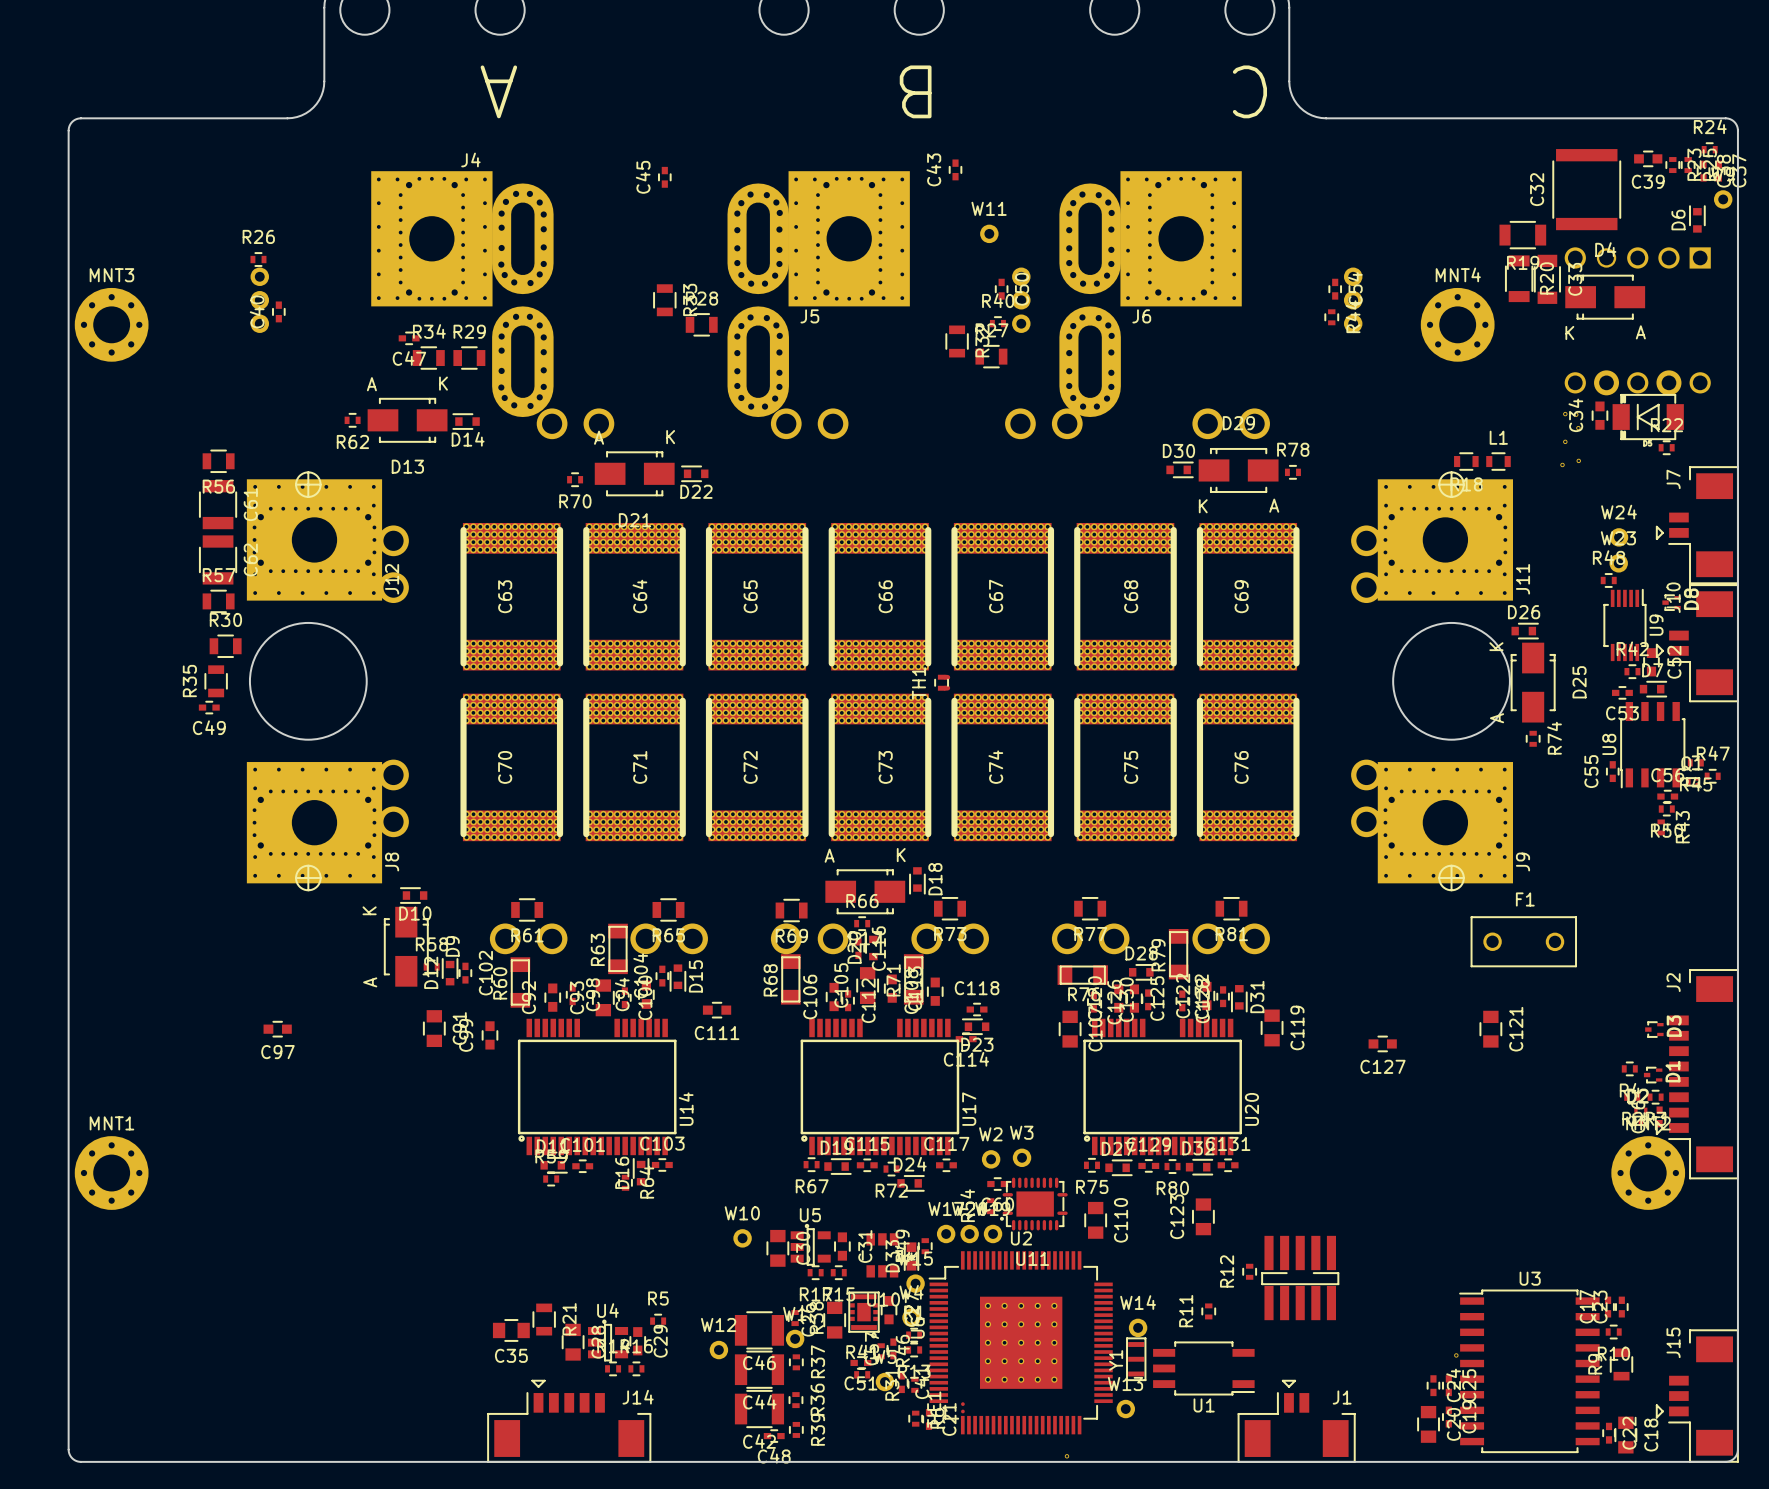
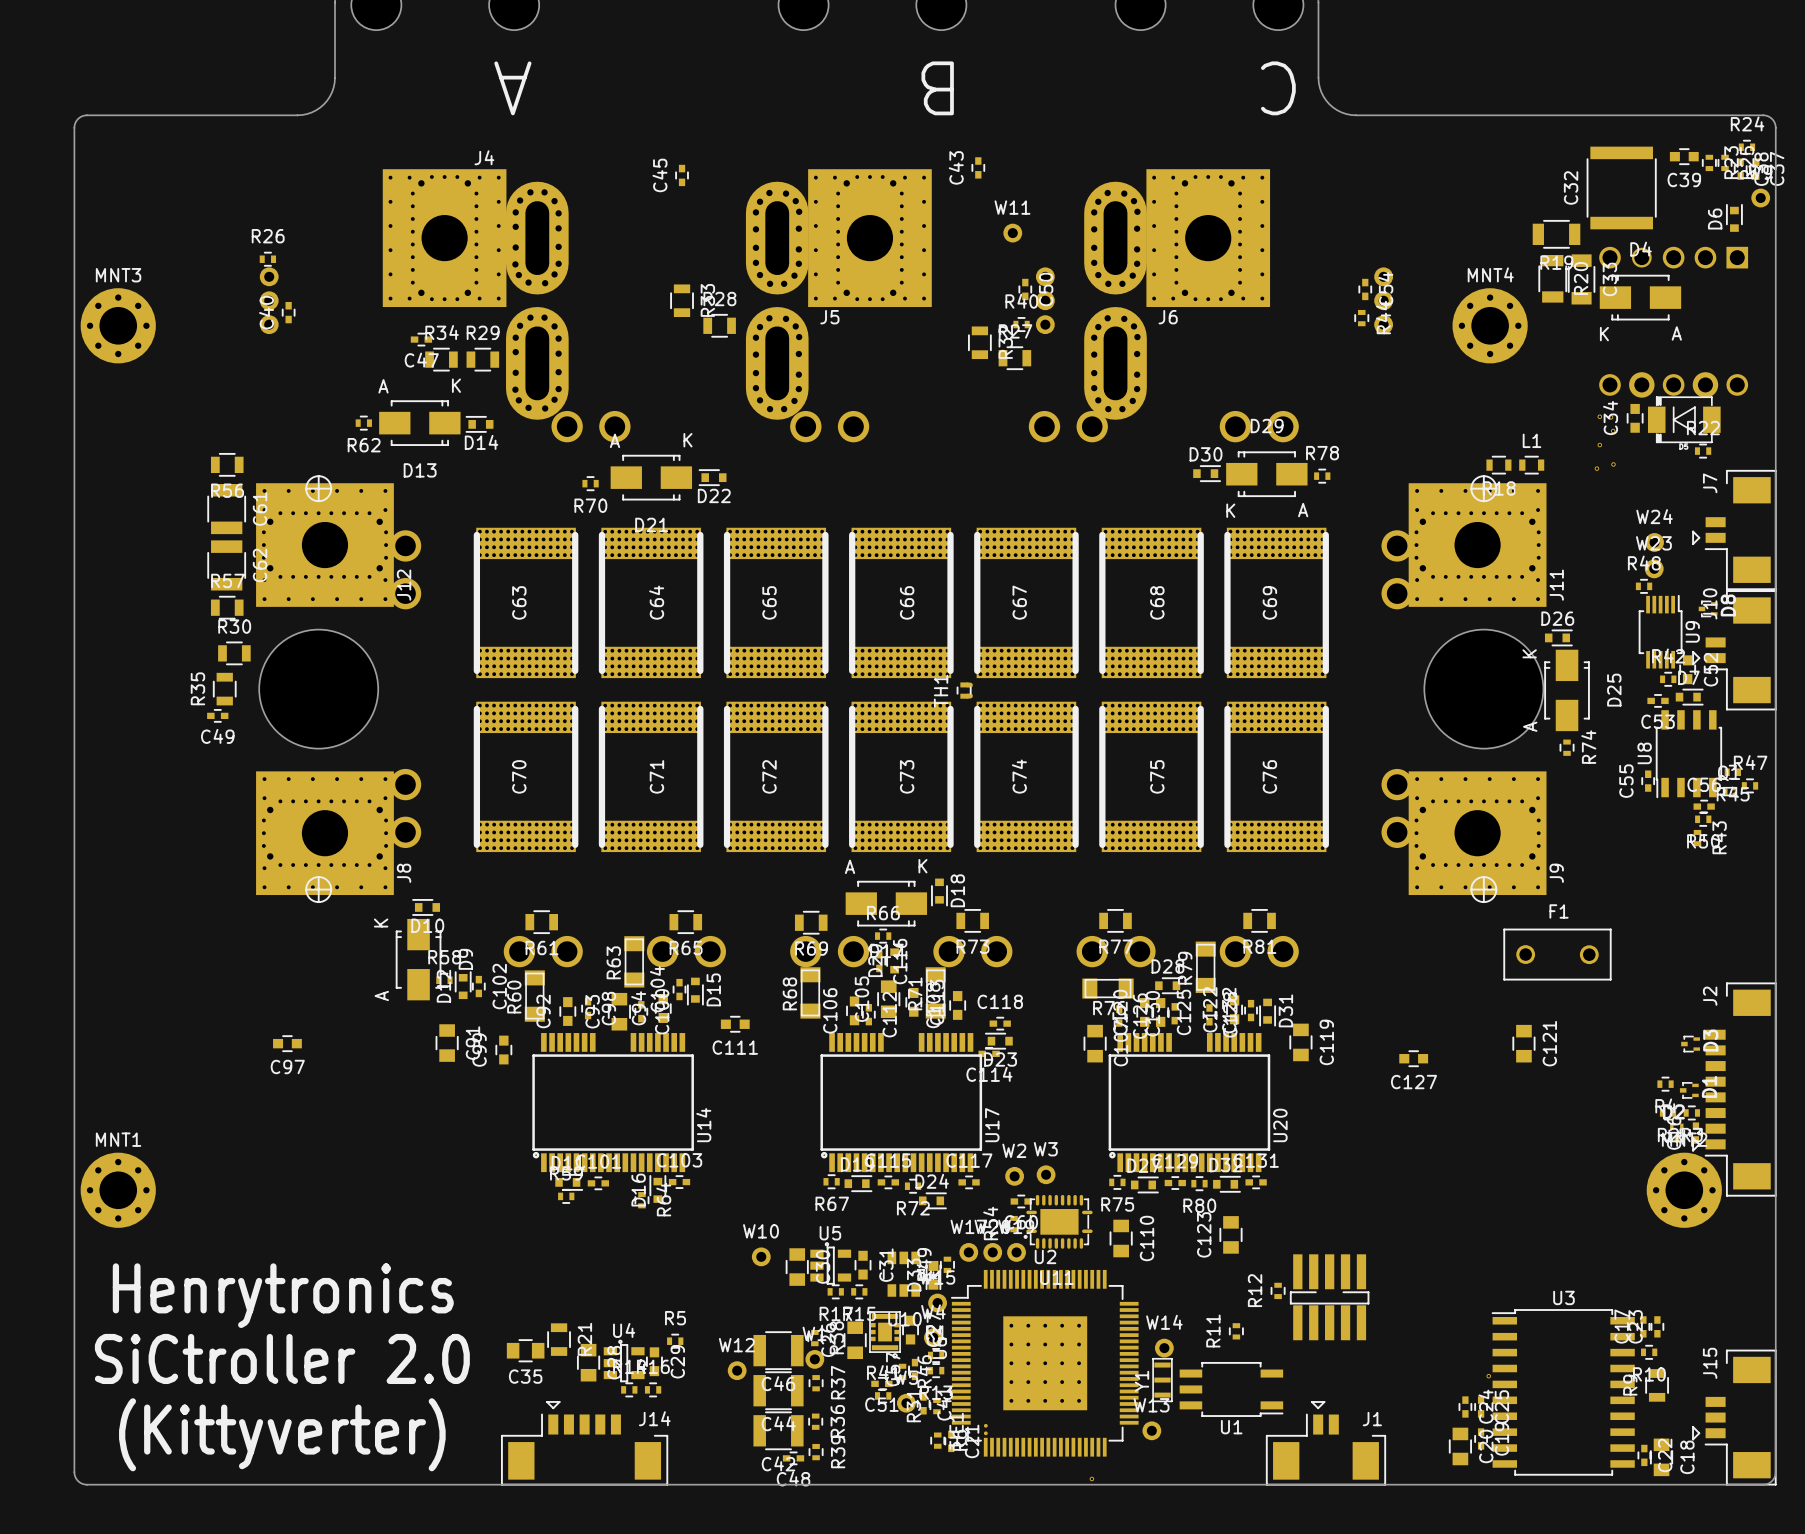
text: none -> Henrytronics (283, 1295)
text: none -> SiCtroller 2.0 (282, 1358)
text: none -> (Kittyverter) (282, 1434)

